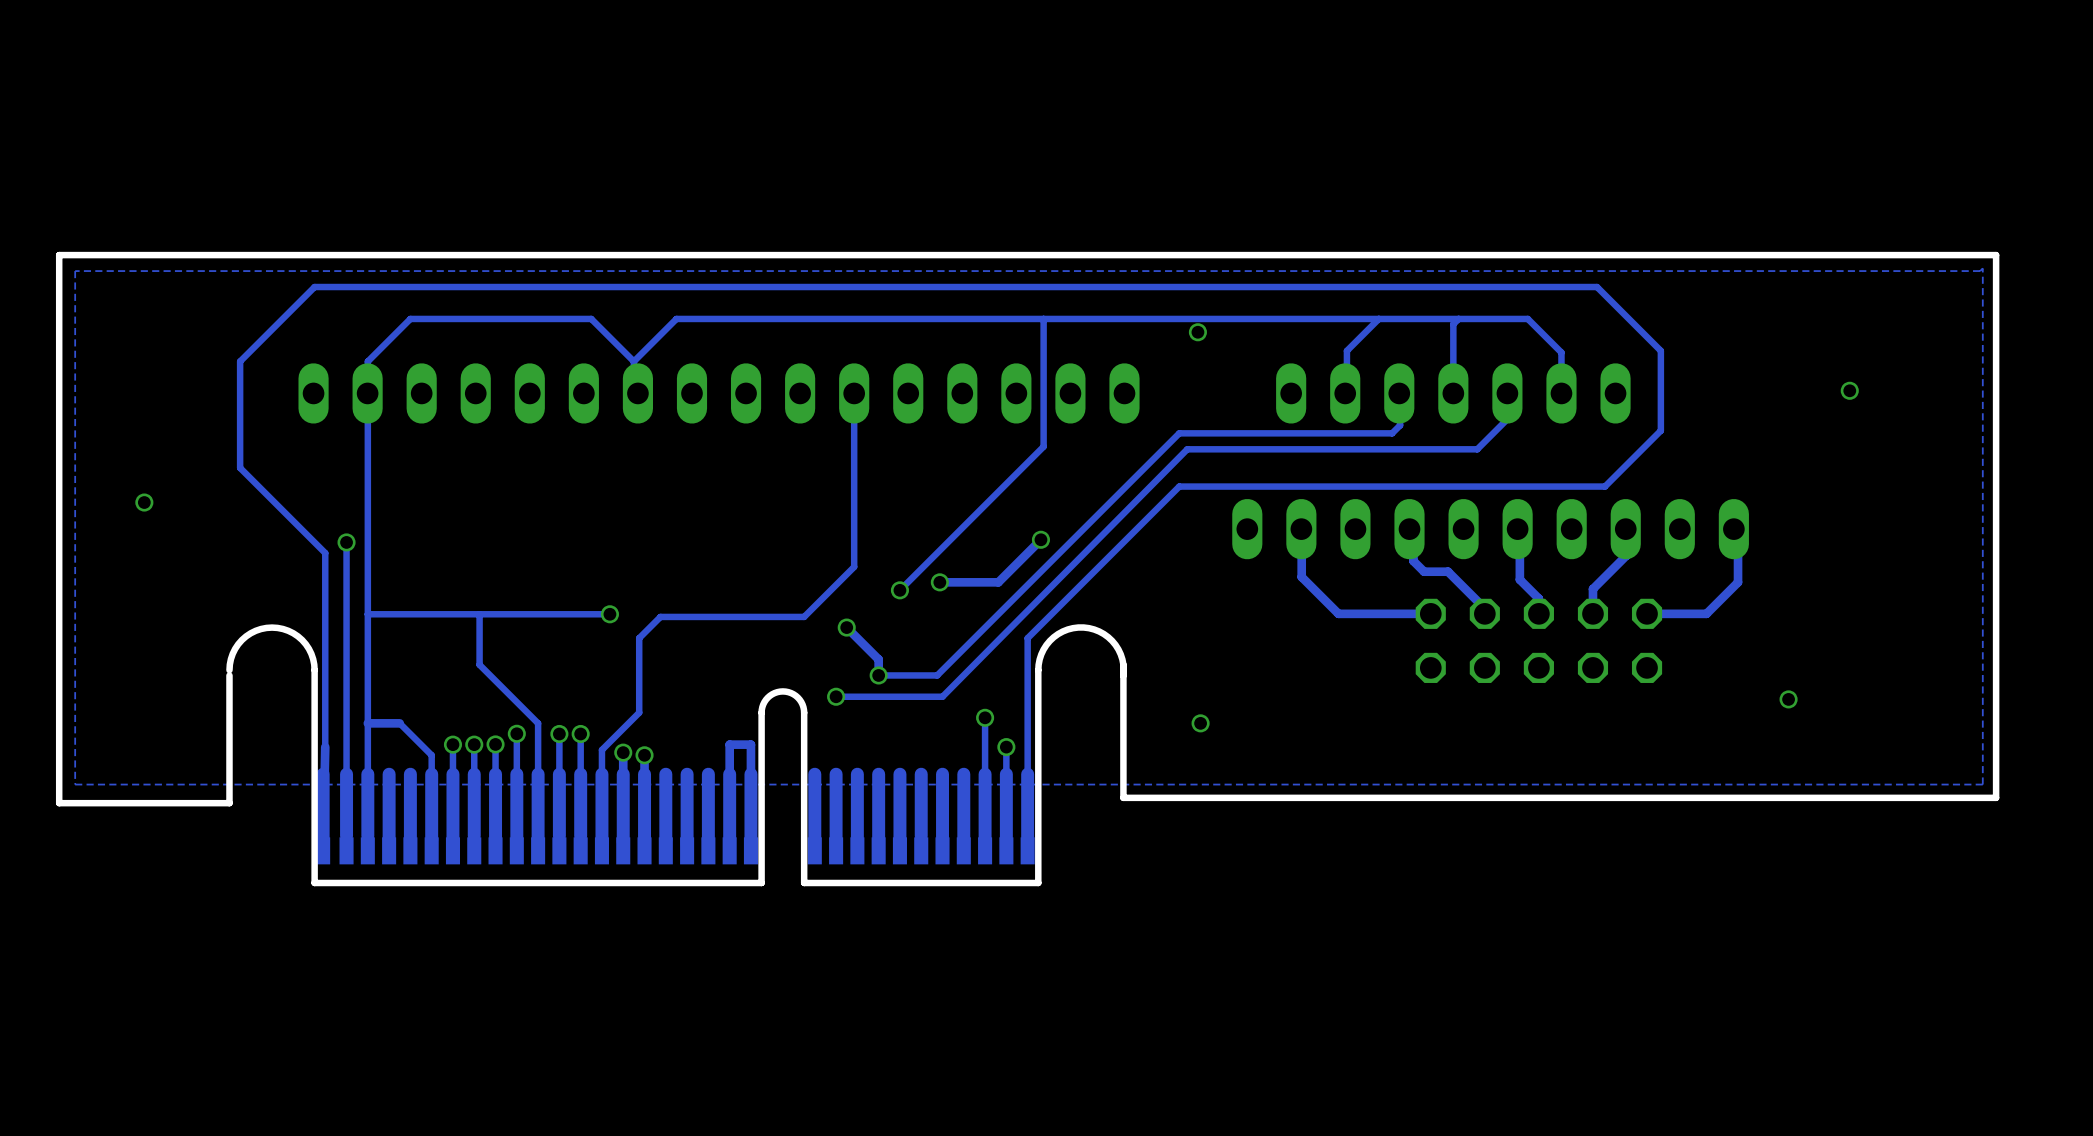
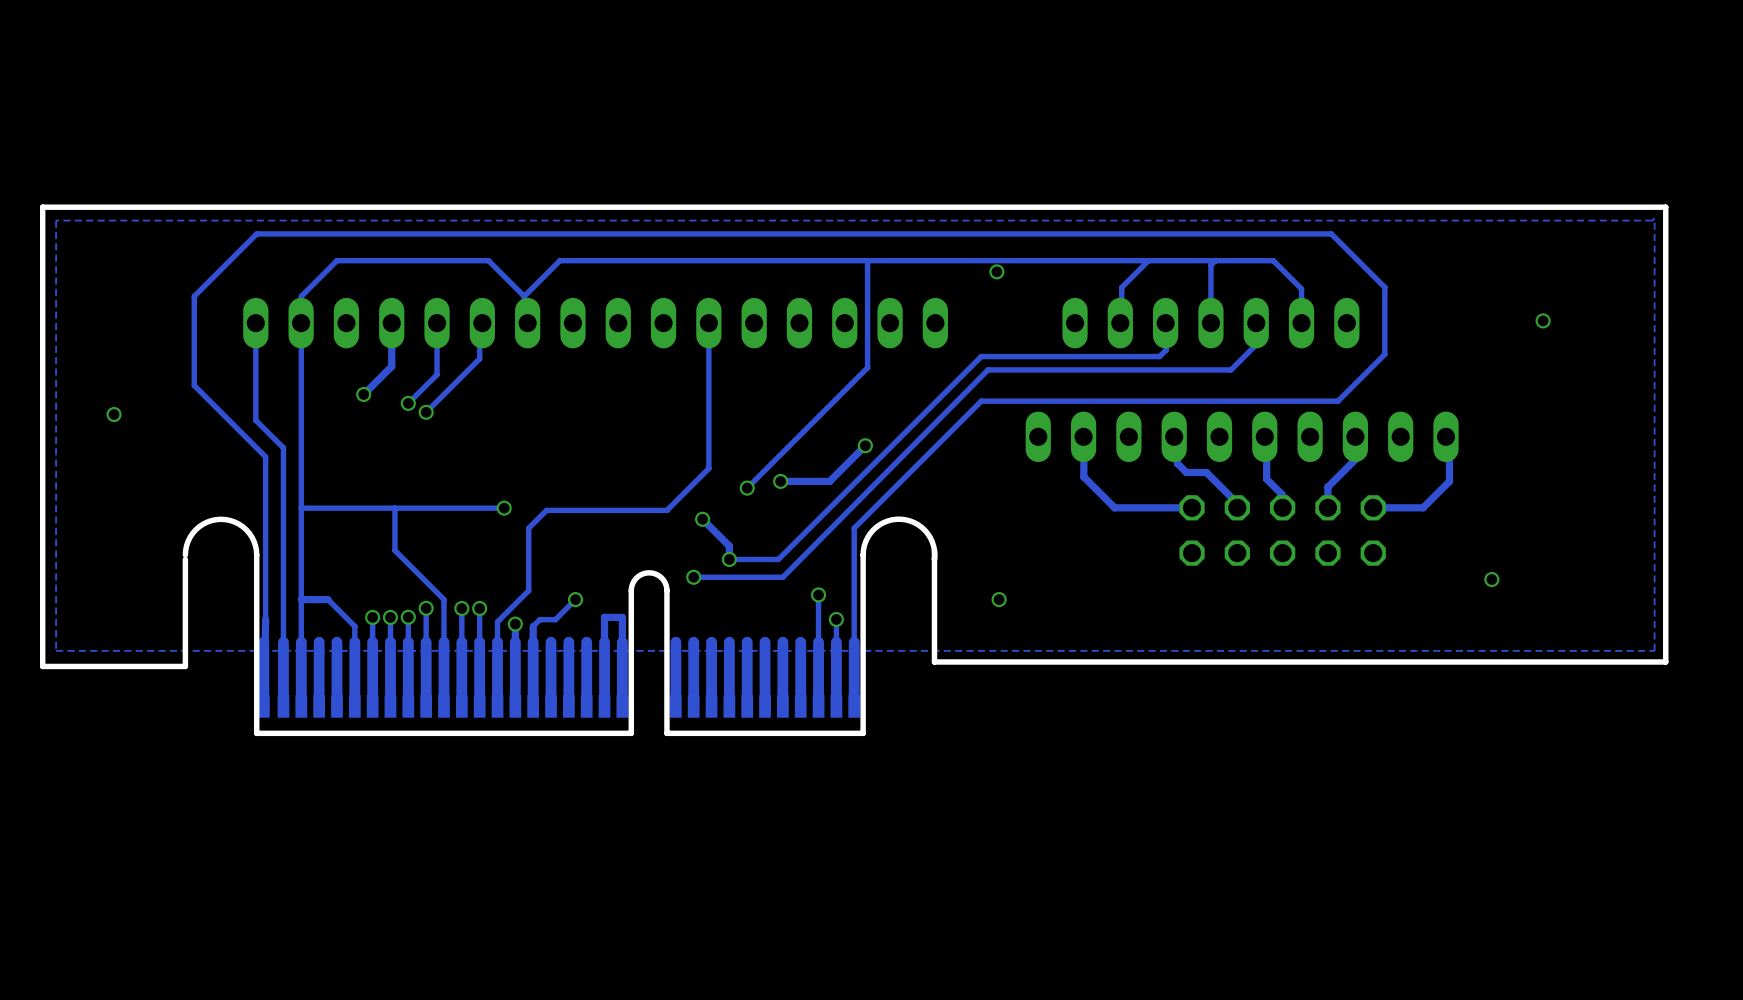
track: none -> (255, 323) (255, 420) (283, 447)
track: none -> (391, 323) (391, 366) (363, 394)
track: none -> (437, 323) (437, 374) (408, 403)
track: none -> (482, 323) (479, 325) (479, 358) (426, 412)
via: none -> (363, 394)
via: none -> (408, 403)
via: none -> (426, 412)
via: (346, 542) -> none
track: none -> (575, 599) (555, 619) (539, 619) (533, 626)
via position: (644, 755) -> (575, 599)

